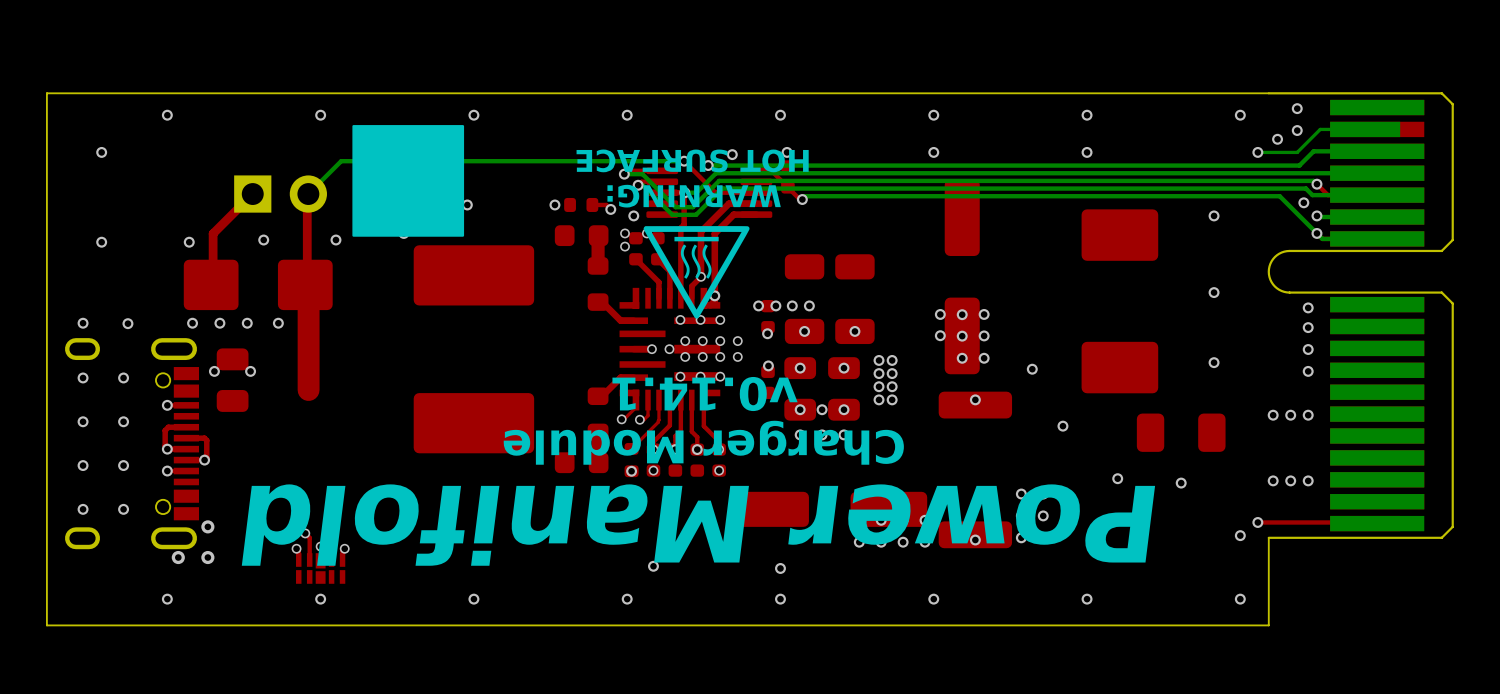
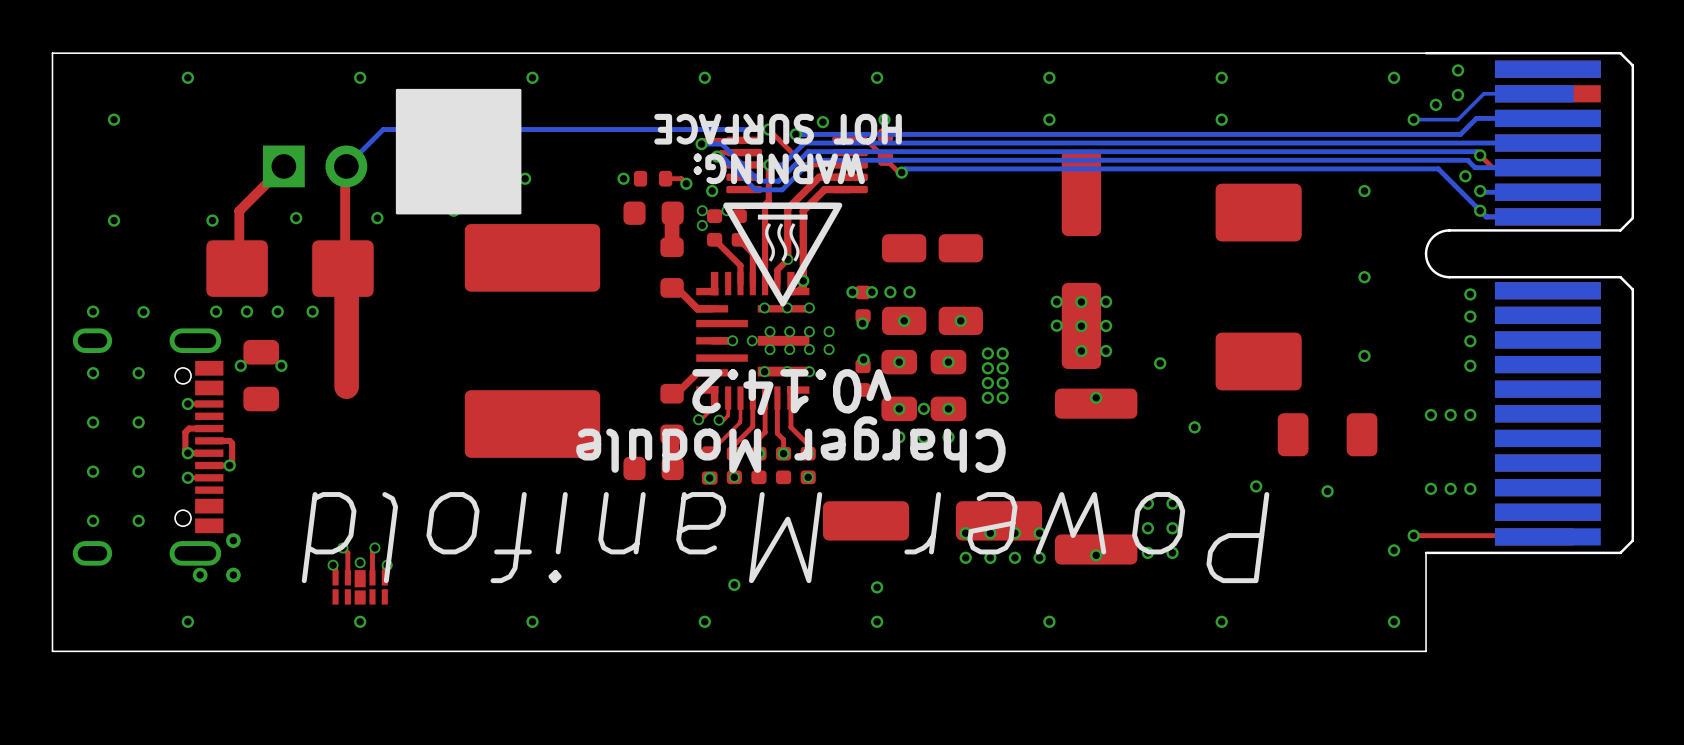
text: v0.14.1 (705, 394) -> v0.14.2 (791, 392)

